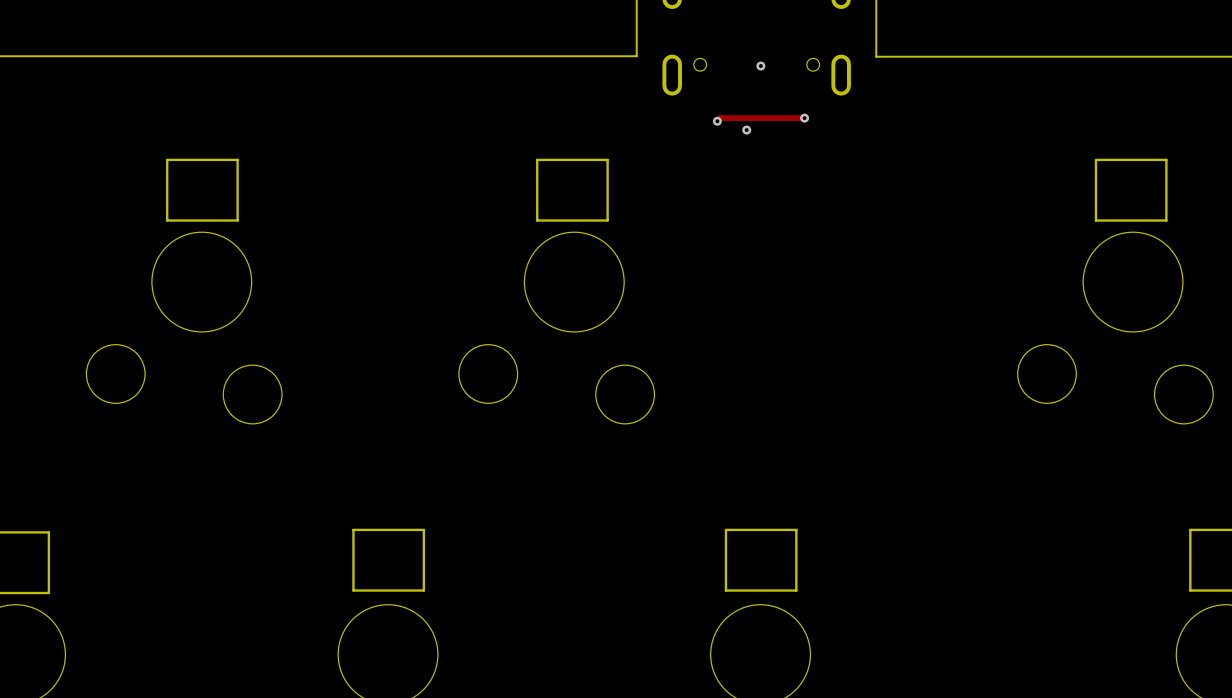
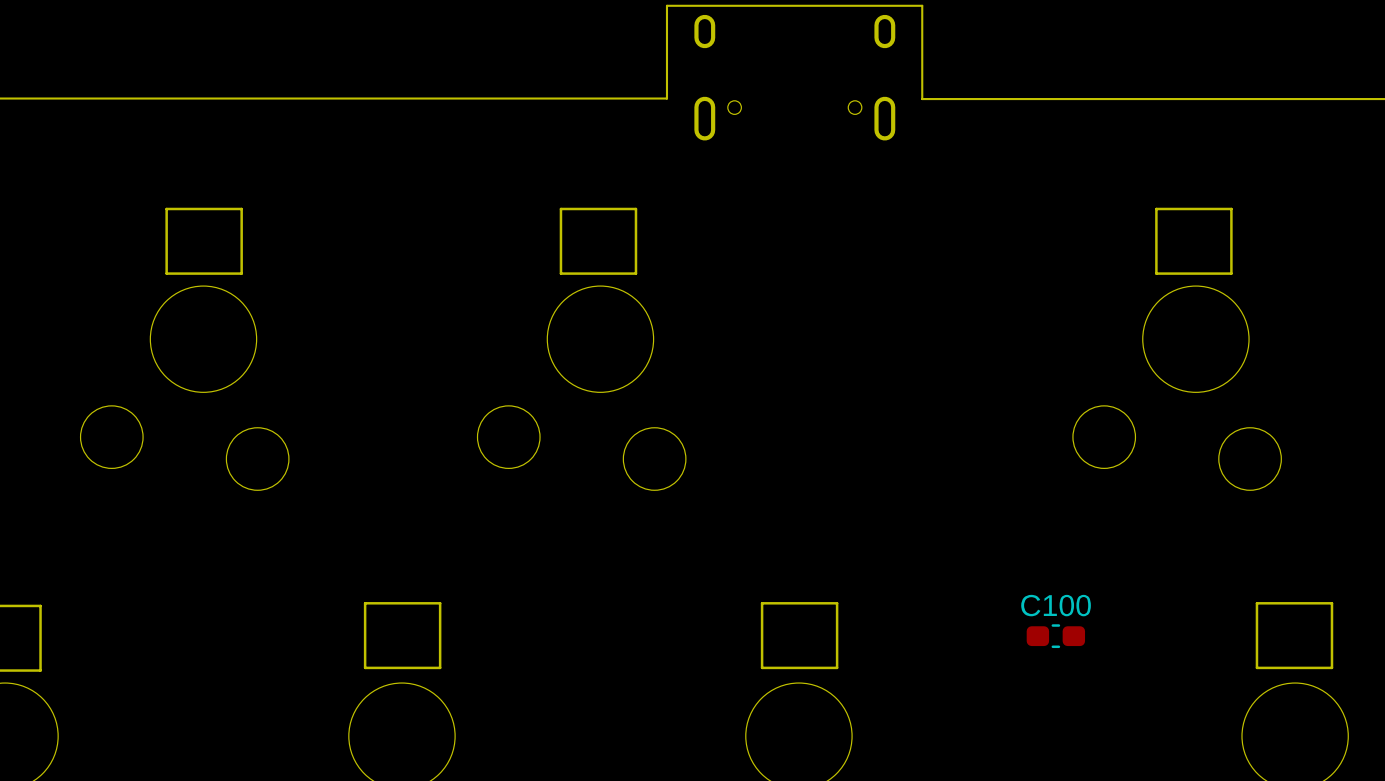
via: (760, 66) -> none
track: (804, 118) (720, 118) (717, 121) -> none
via: (804, 118) -> none
via: (717, 121) -> none
via: (746, 130) -> none
C100: none -> (1055, 636)

